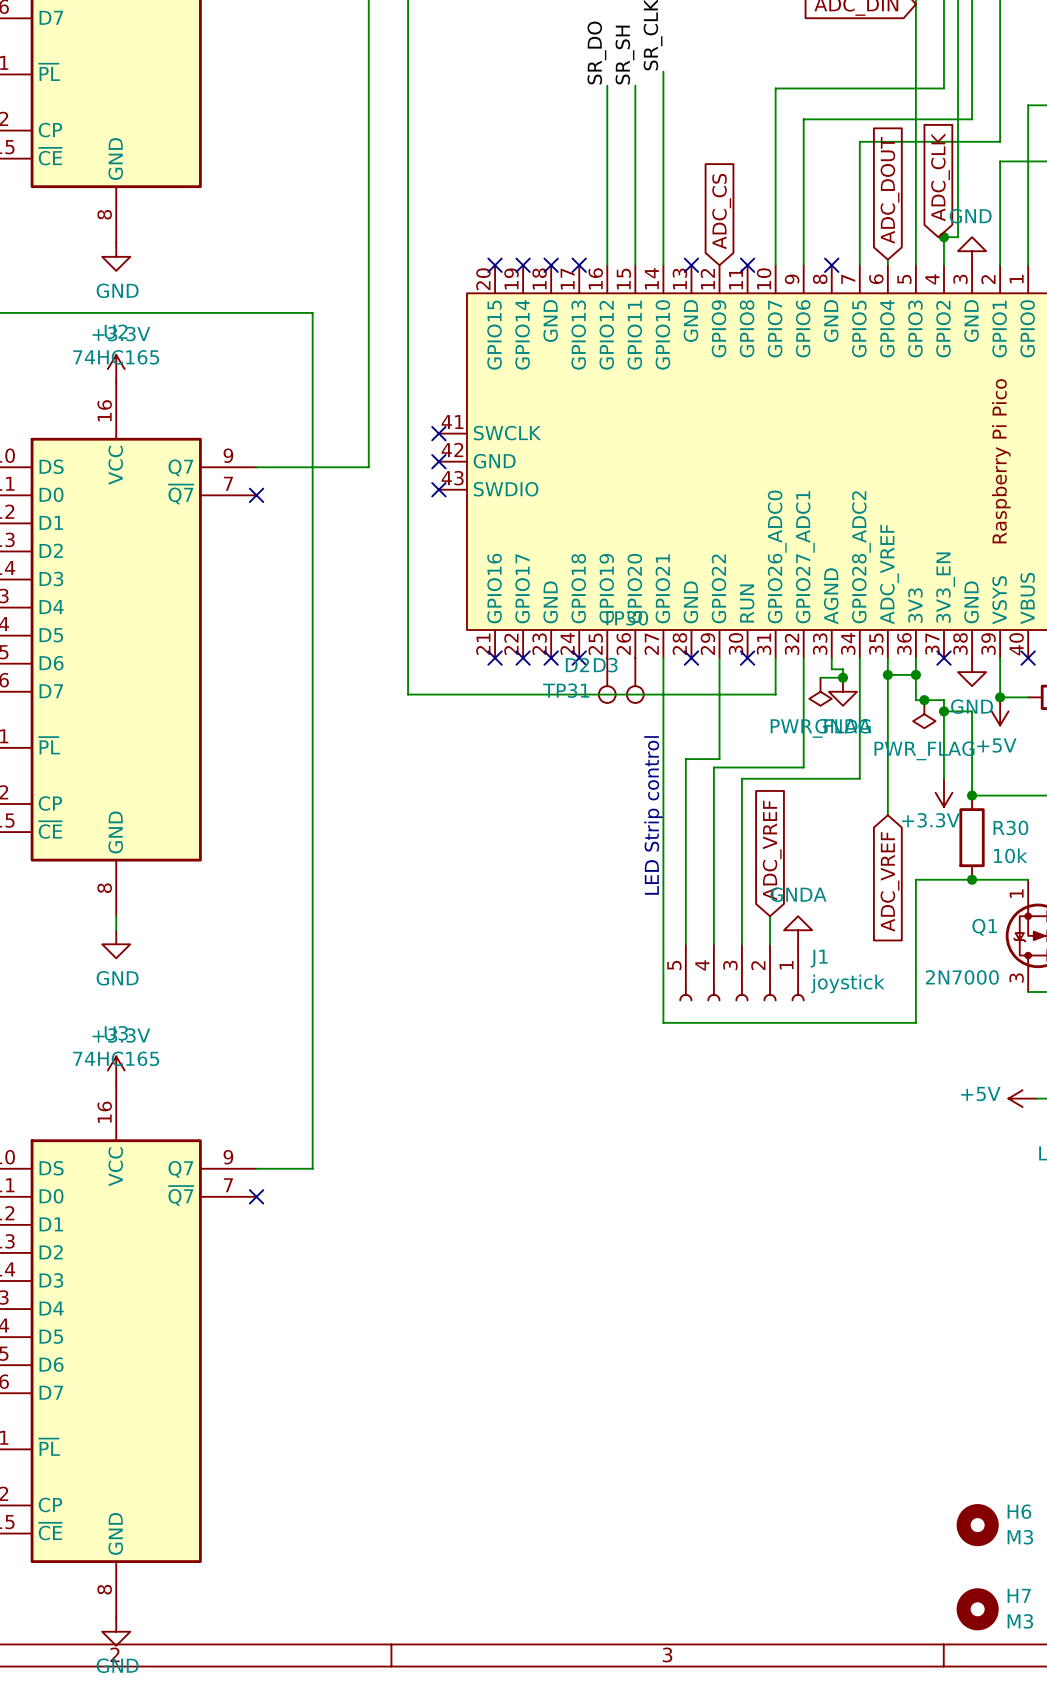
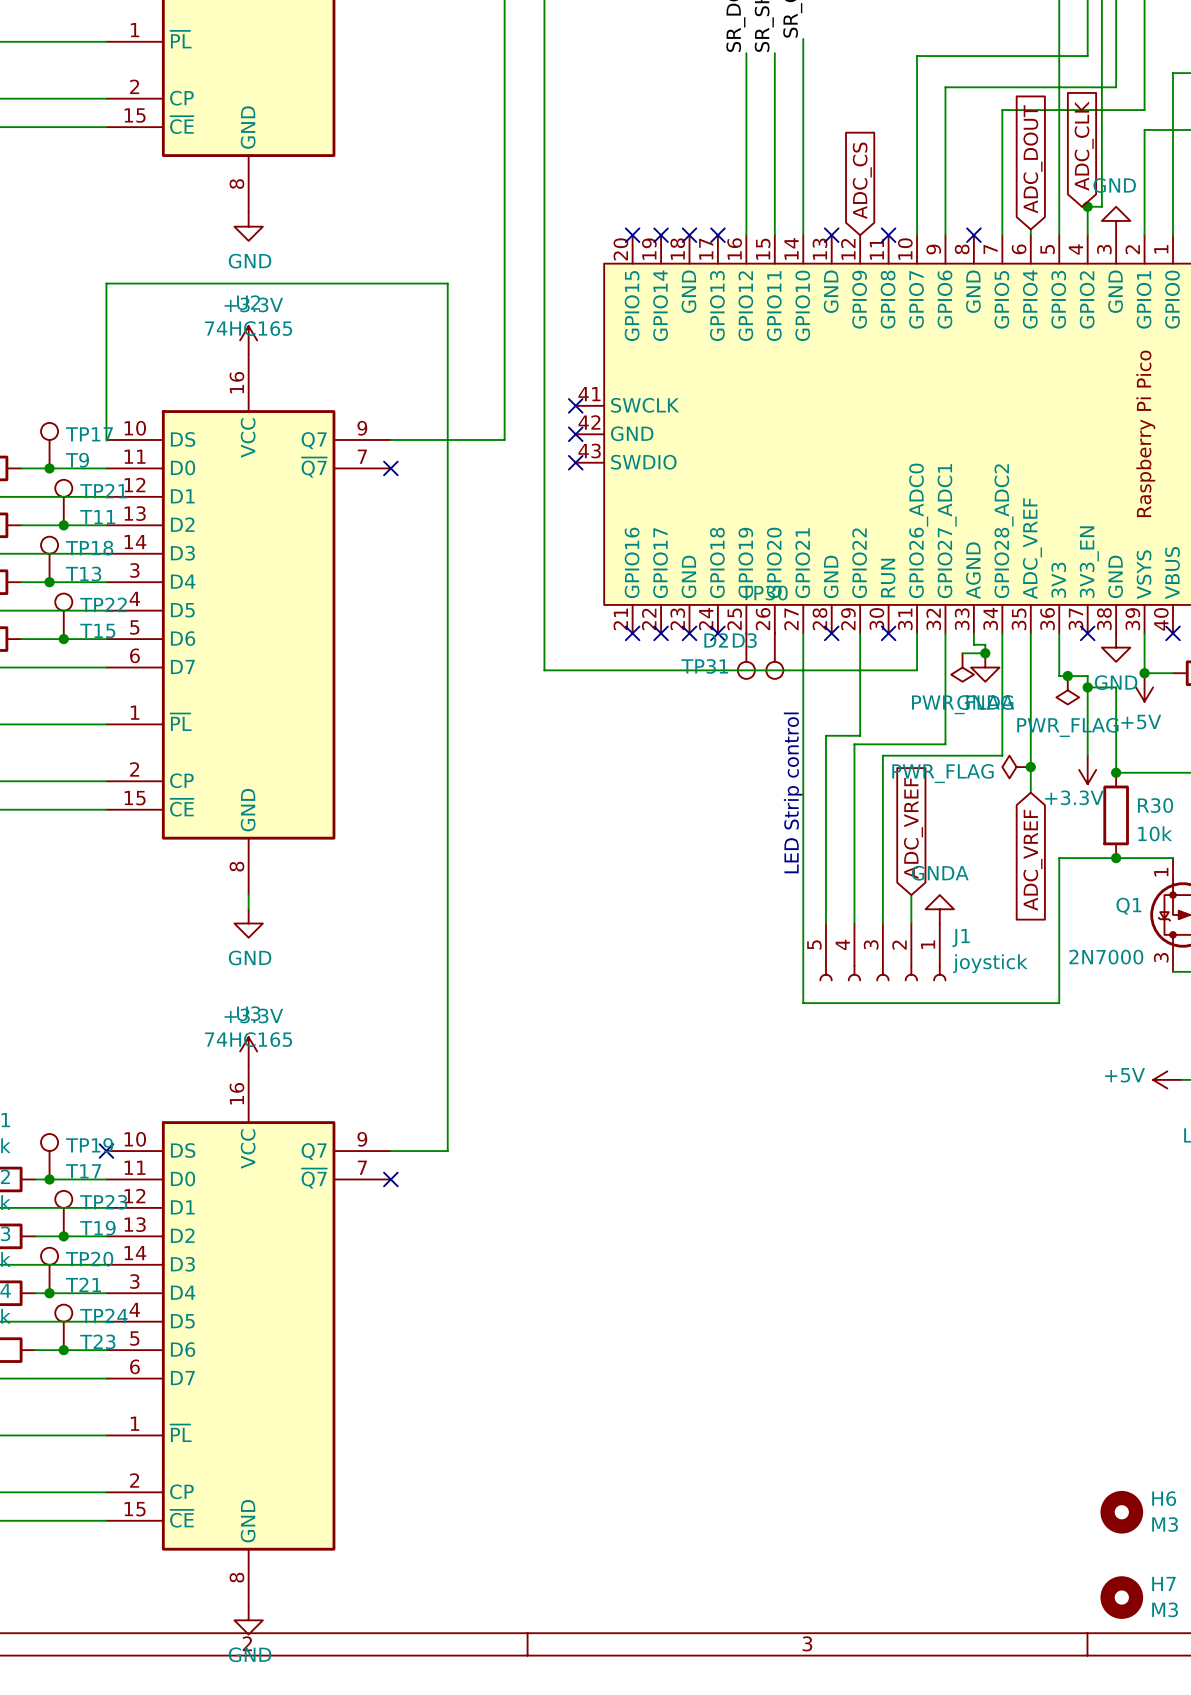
wire: (887, 674) (915, 674) -> none
junction: (887, 674) -> none
junction: (915, 674) -> none
power symbol: none -> PWR_FLAG (1016, 767)
junction: none -> (1030, 767)

